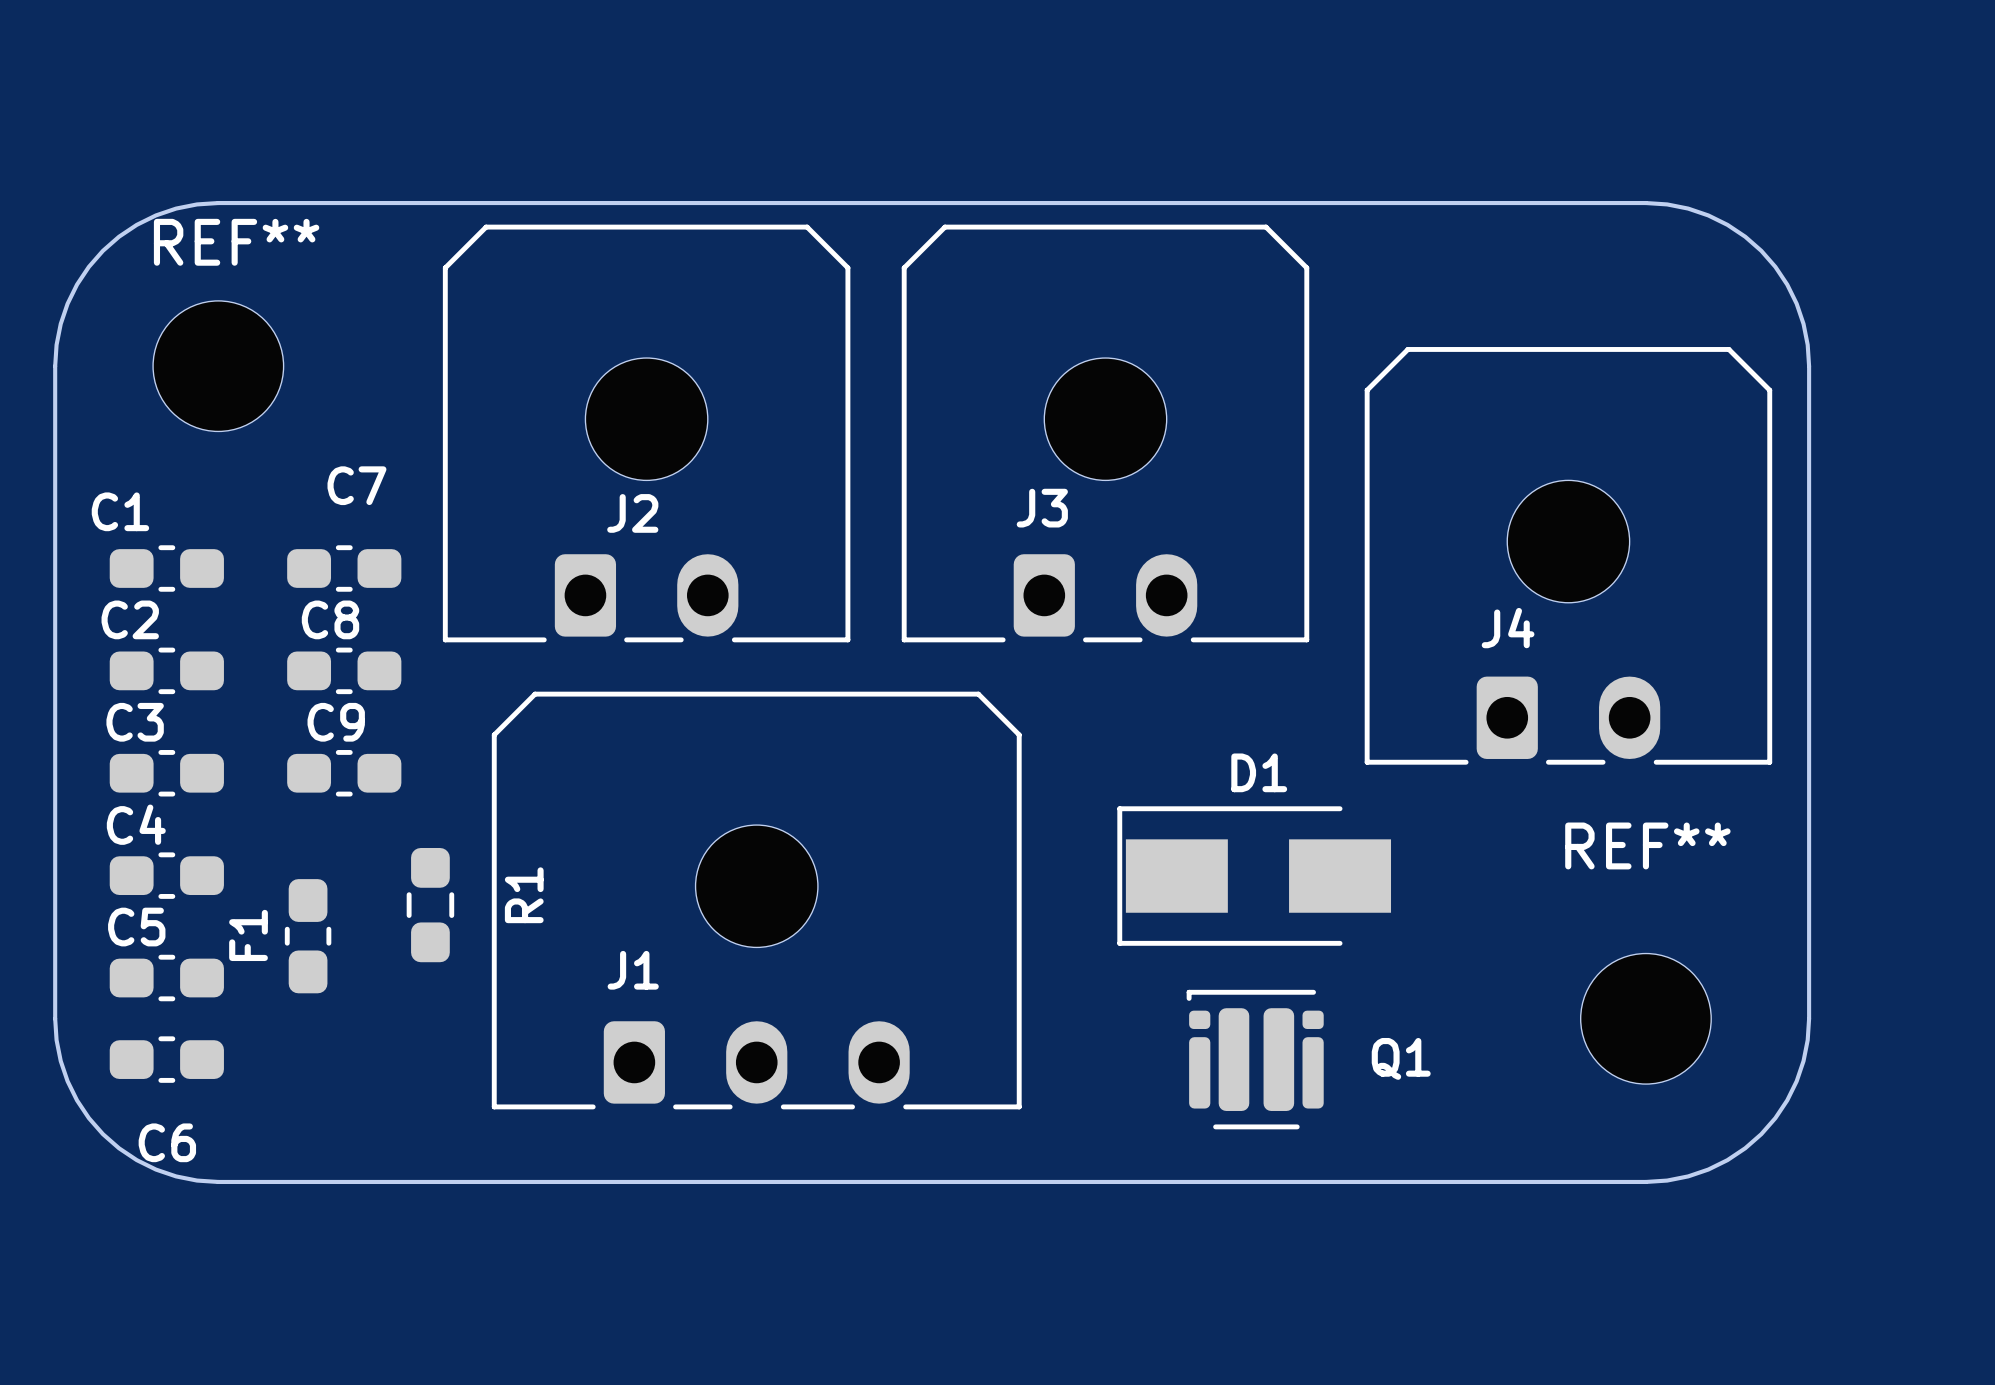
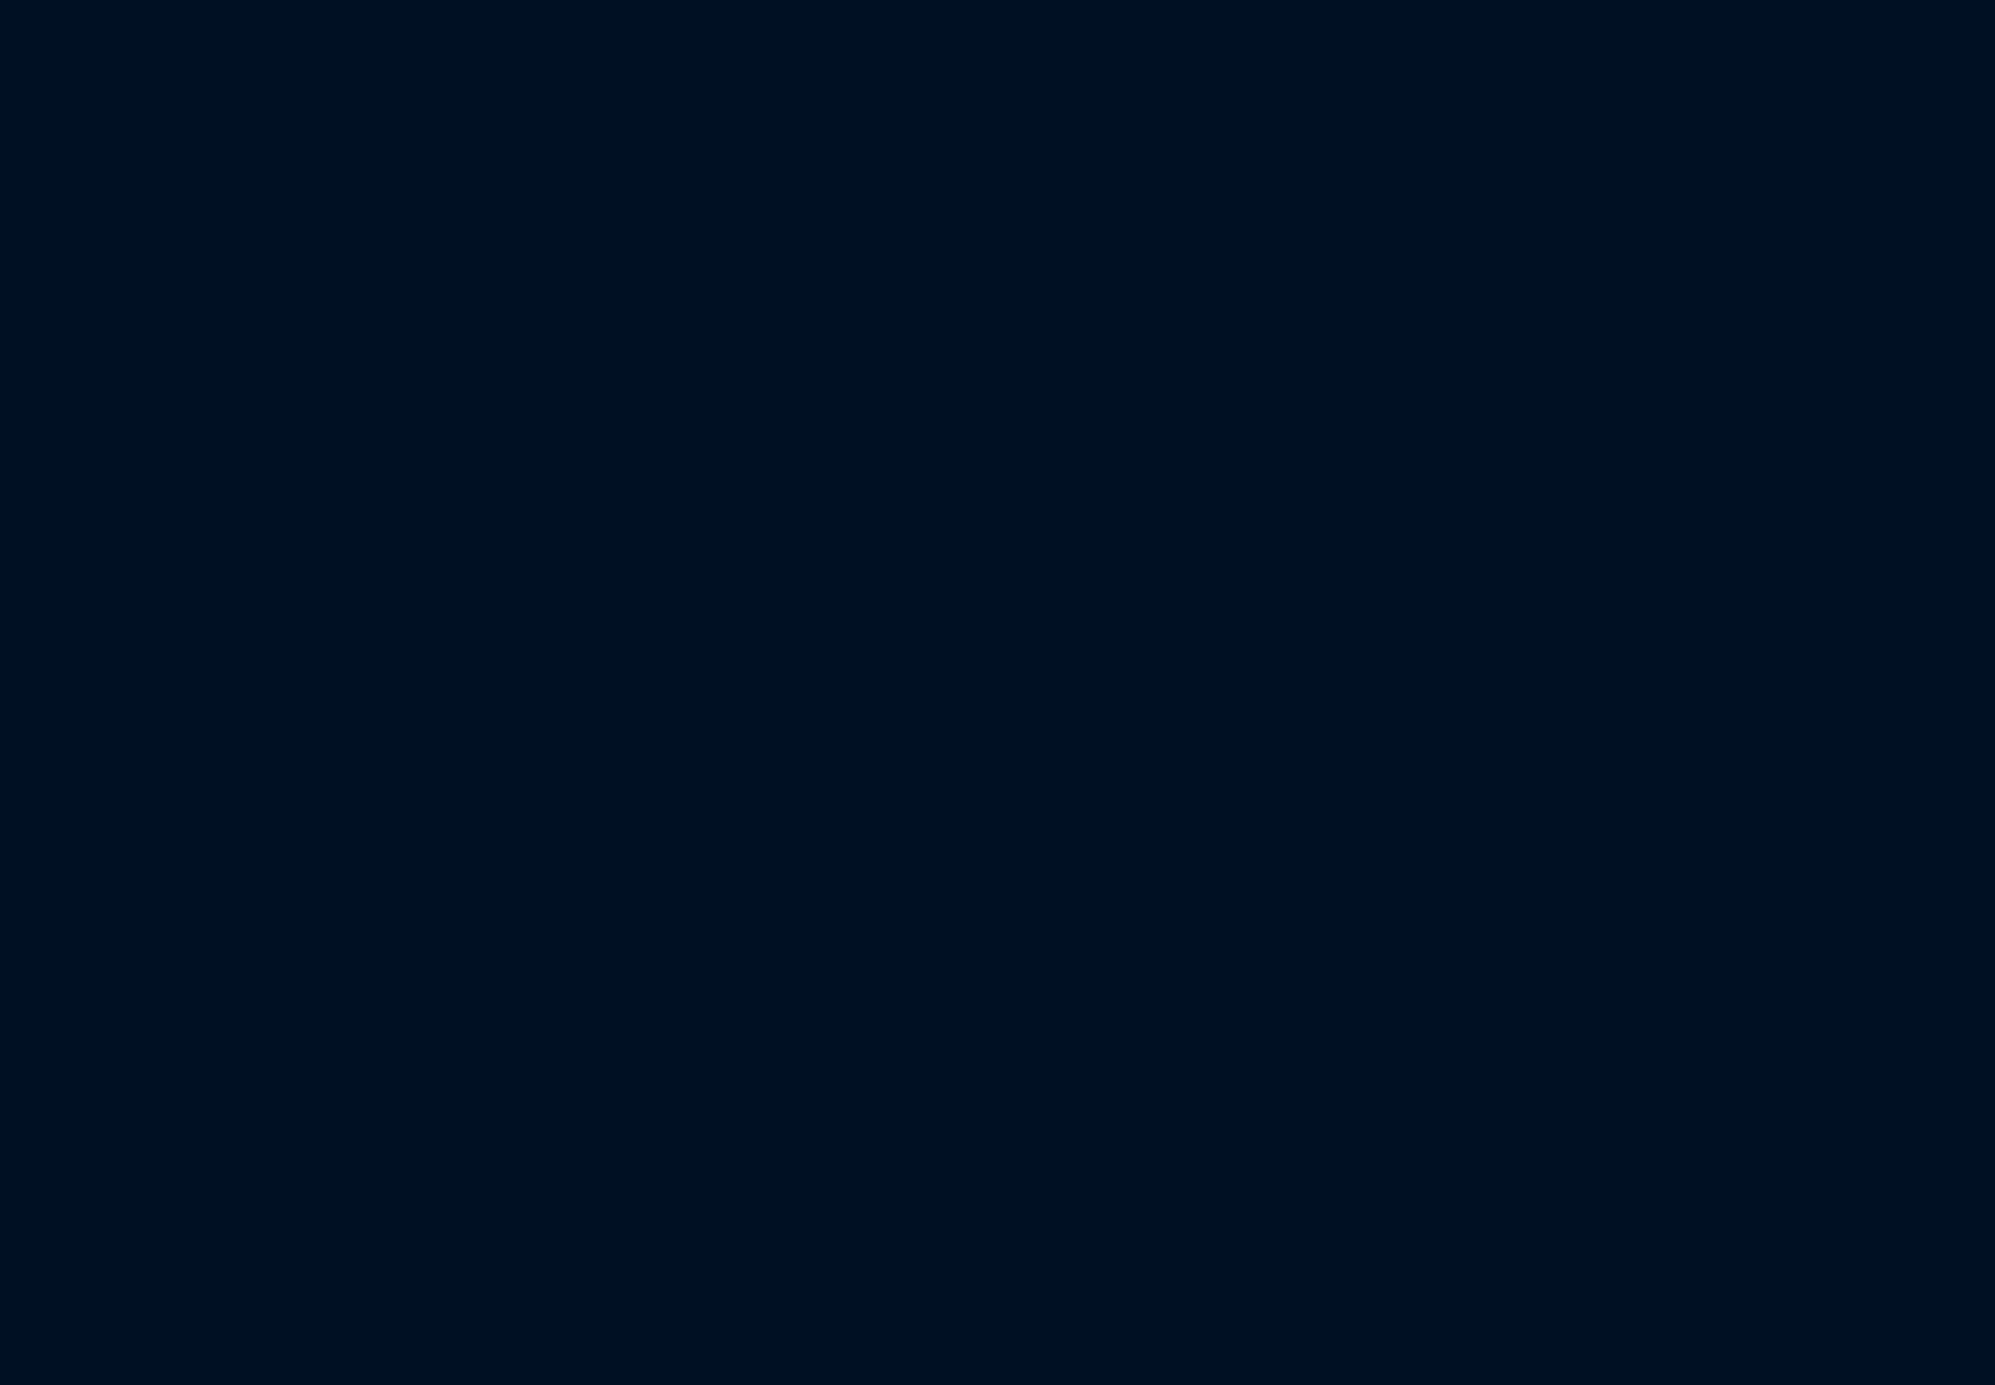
board edge: (218, 203) (1645, 203) (1688, 208) (1727, 224) (1761, 250) (1787, 284) (1803, 323) (1807, 344) (1809, 1018) (1803, 1061) (1787, 1100) (1761, 1134) (1727, 1160) (1688, 1176) (1645, 1181) (218, 1181) (176, 1176) (136, 1160) (102, 1134) (77, 1100) (60, 1061) (56, 1040) (56, 344) (67, 303) (88, 266) (102, 250) (136, 224) (155, 215) (176, 208) (218, 203) -> none
REF**: (218, 366) -> none
J2: (646, 433) -> none
J3: (1105, 433) -> none
J4: (1568, 555) -> none
C1: (166, 568) -> none
C7: (344, 568) -> none
C2: (166, 670) -> none
C8: (344, 670) -> none
C3: (166, 773) -> none
C9: (344, 773) -> none
C4: (166, 875) -> none
D1: (1254, 876) -> none
J1: (756, 900) -> none
R1: (430, 905) -> none
F1: (308, 936) -> none
C5: (166, 978) -> none
REF**: (1645, 1018) -> none
C6: (166, 1059) -> none
Q1: (1255, 1059) -> none

